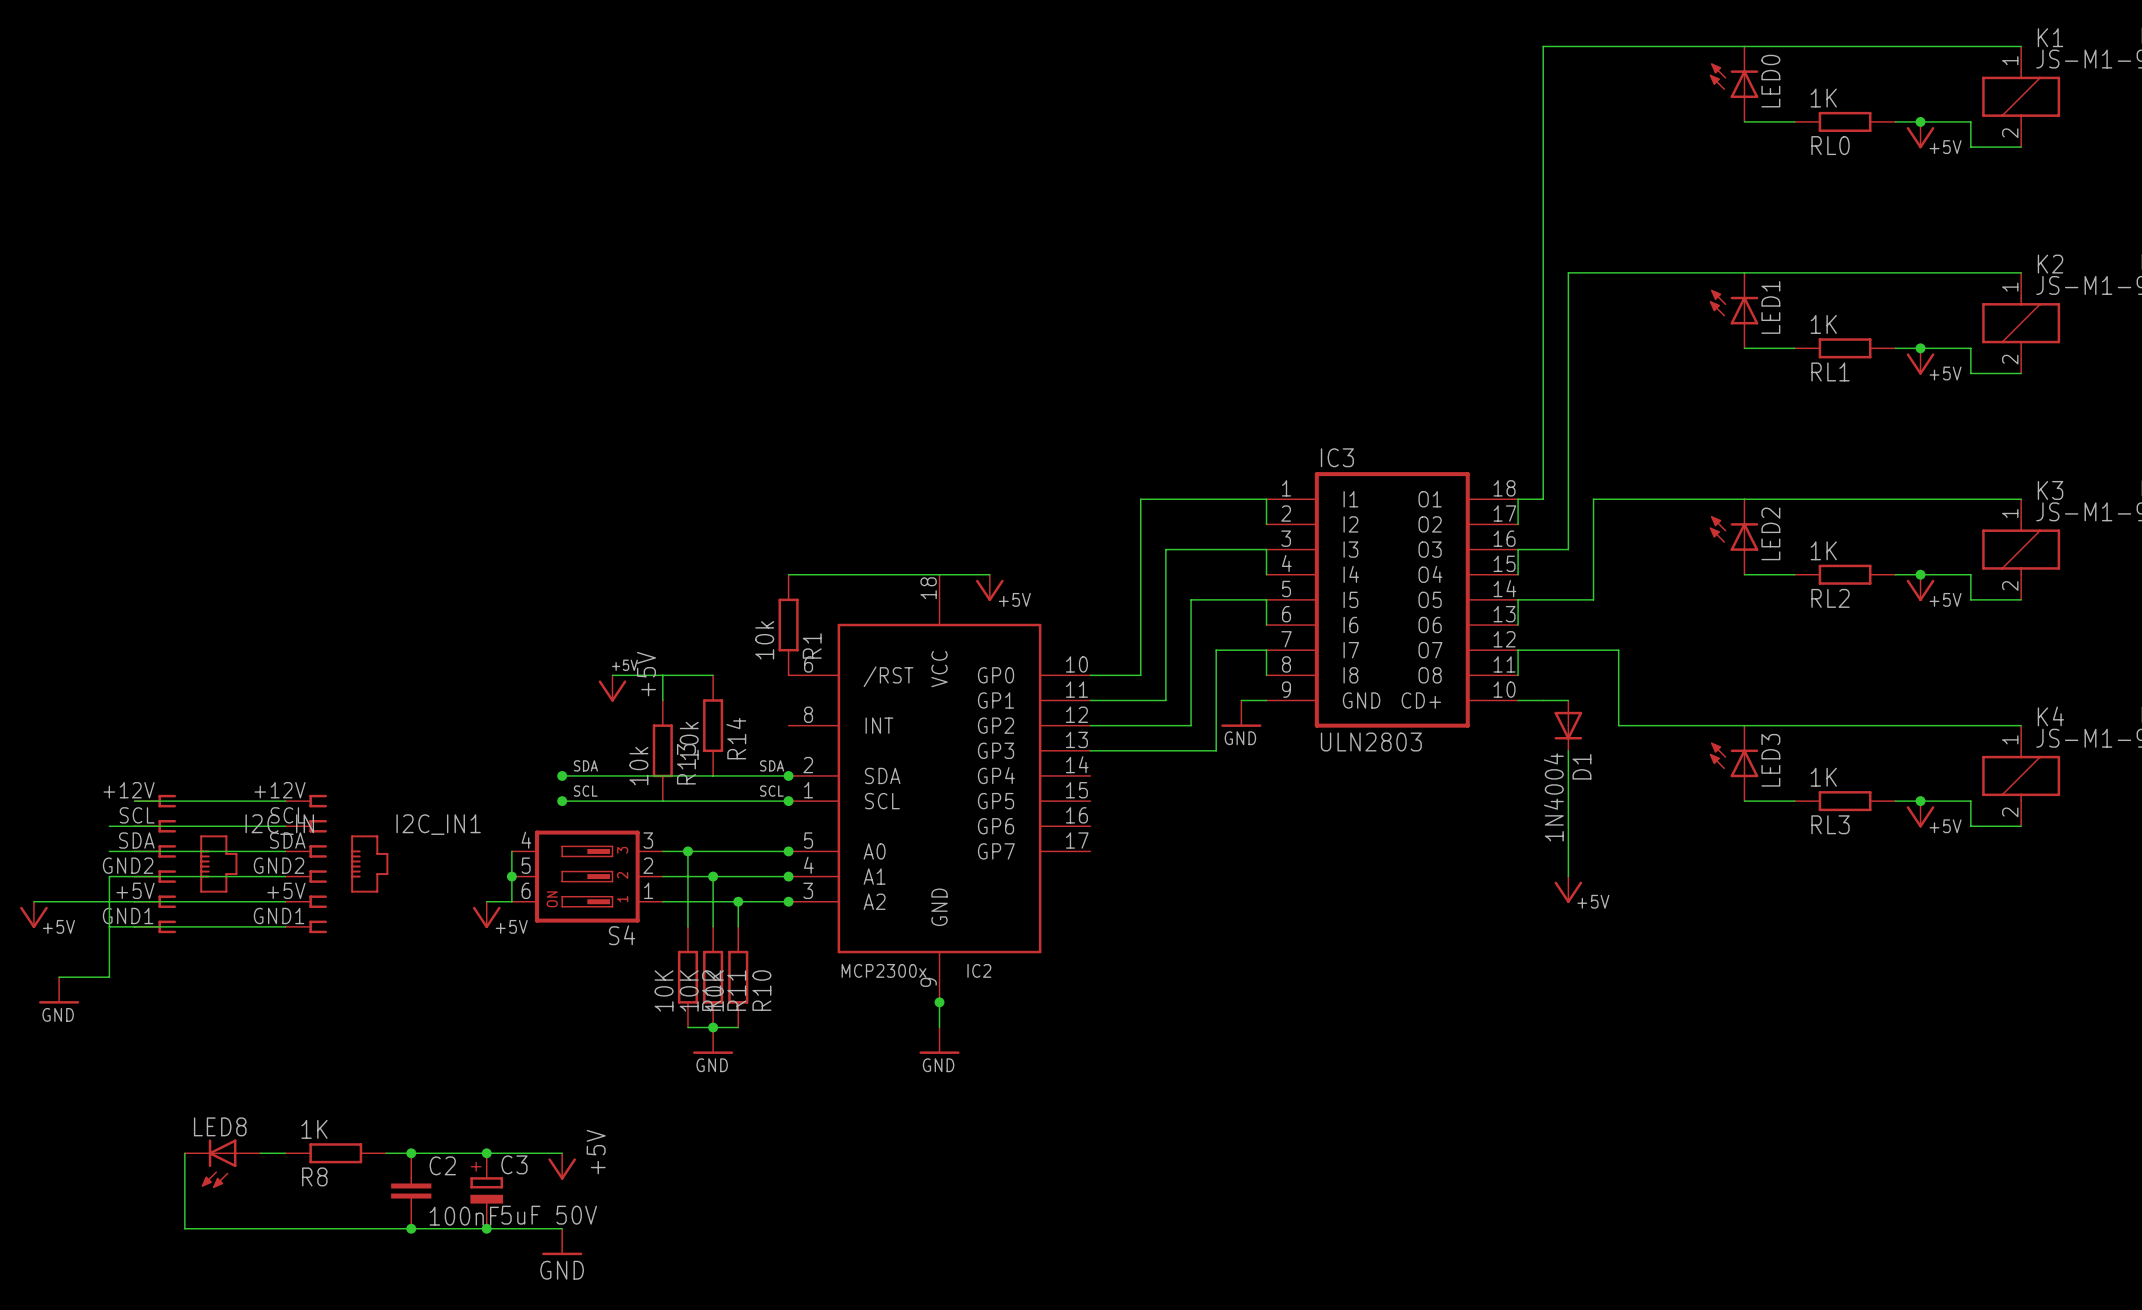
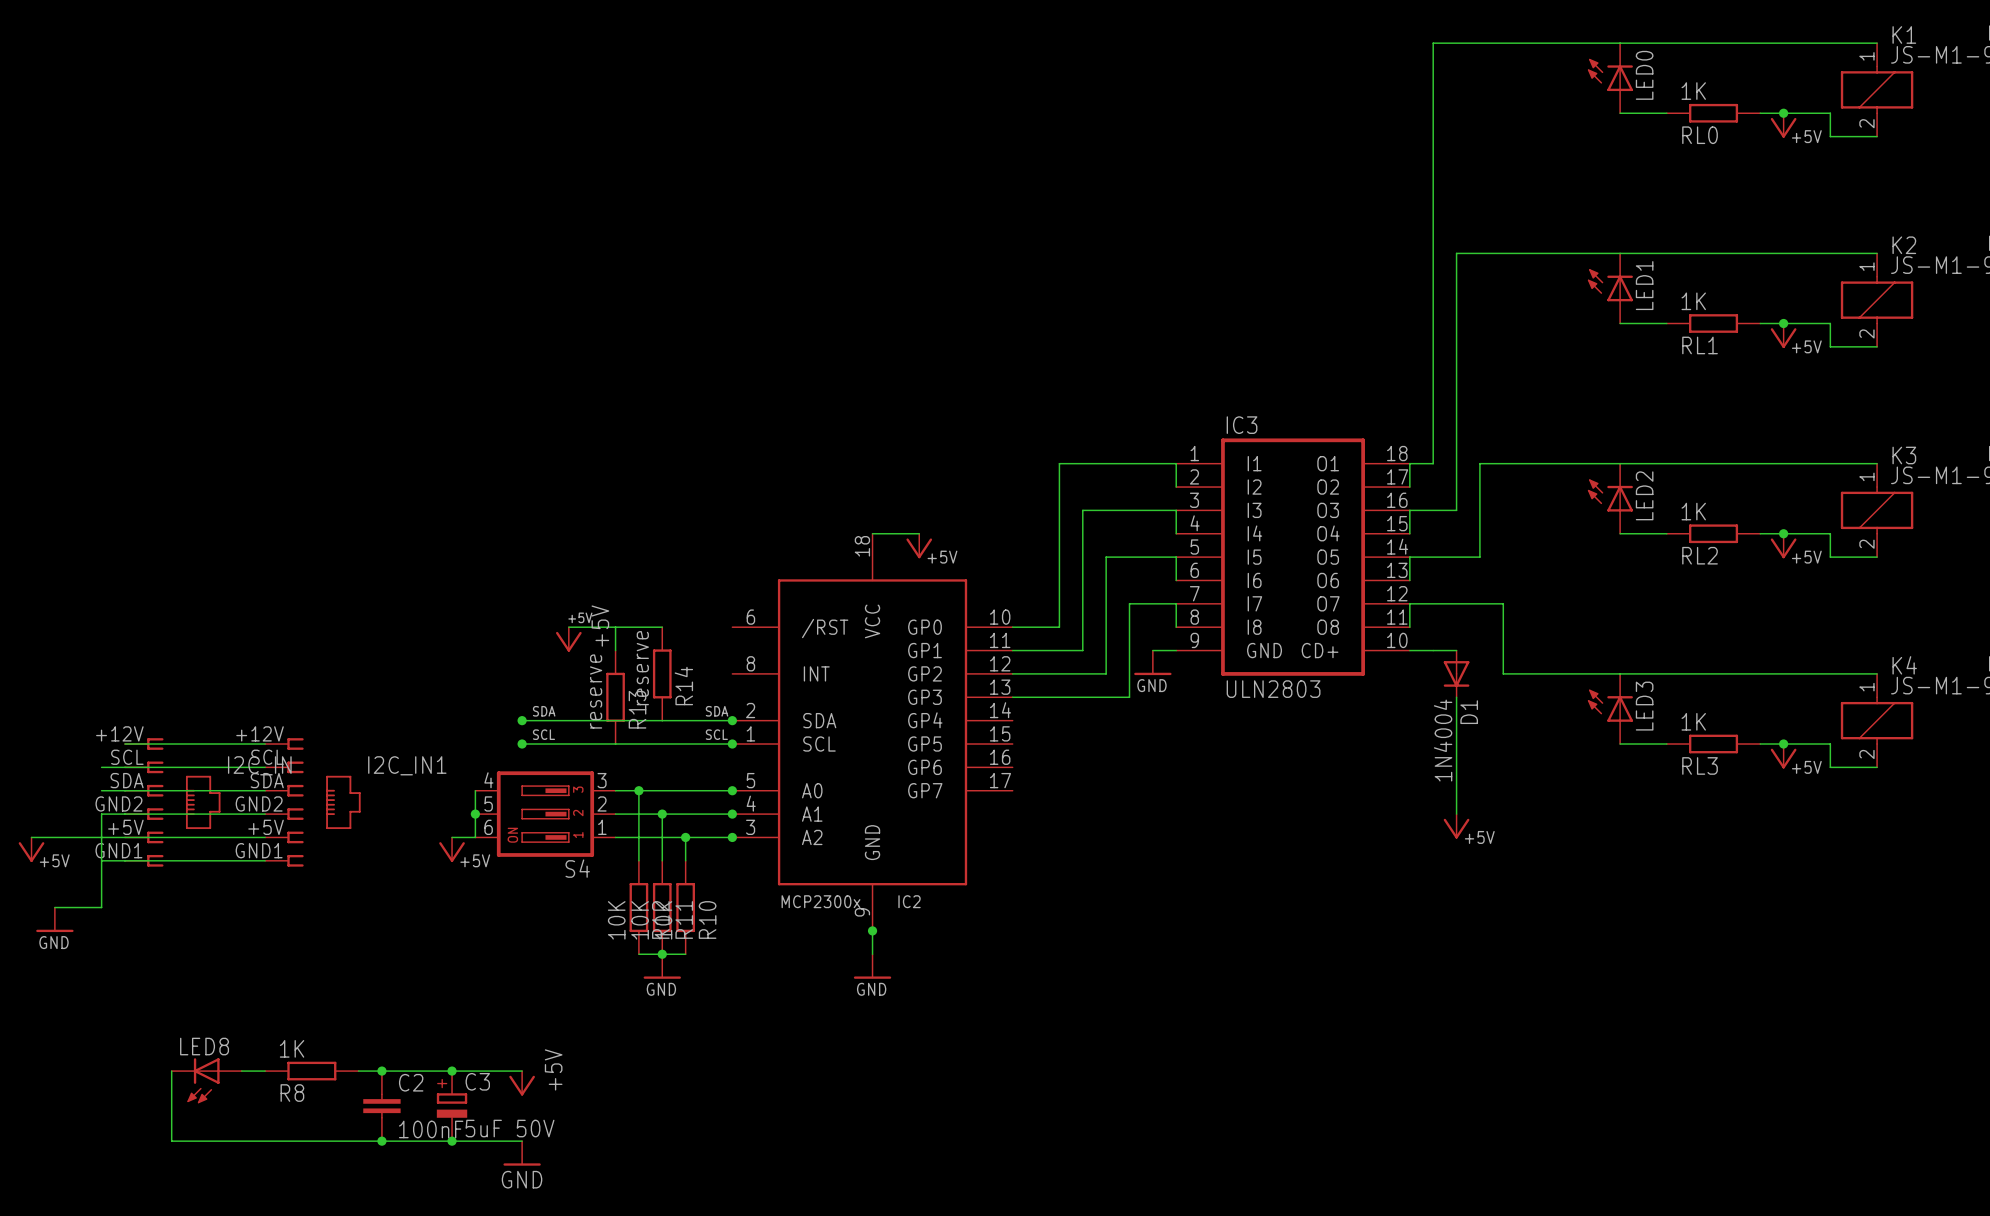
wire: (788, 574) (939, 574) -> none
R1: 10k (788, 625) -> none
R14 value: 10k (689, 740) -> reserve (642, 668)
R13 value: 10k (638, 766) -> reserve (596, 691)

